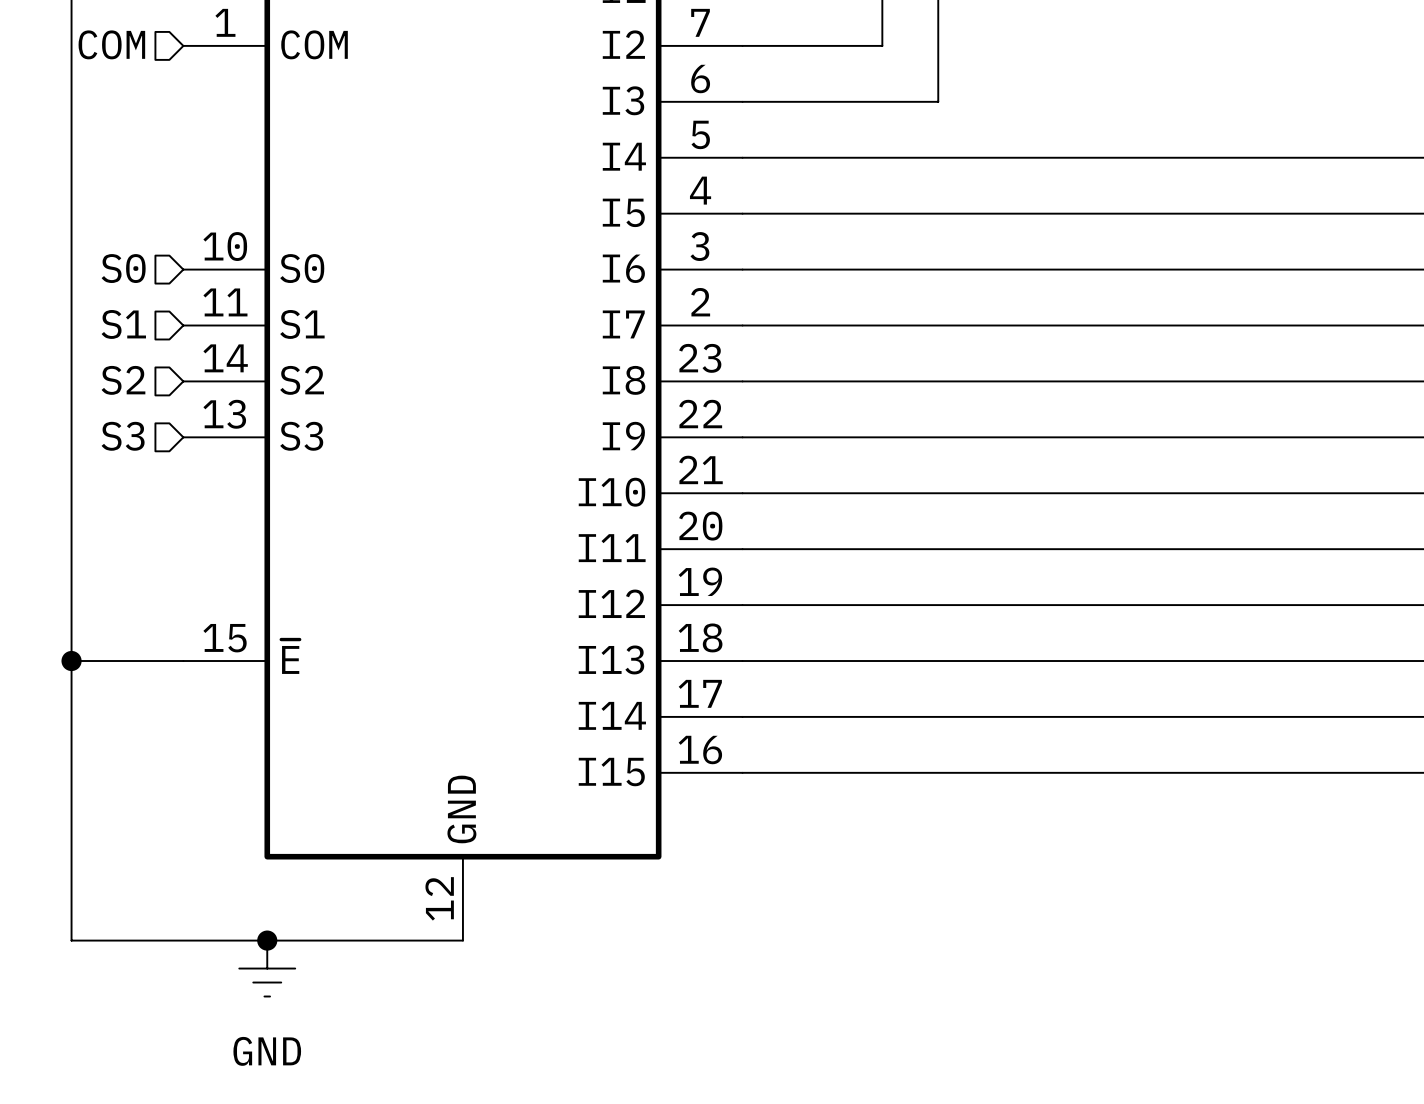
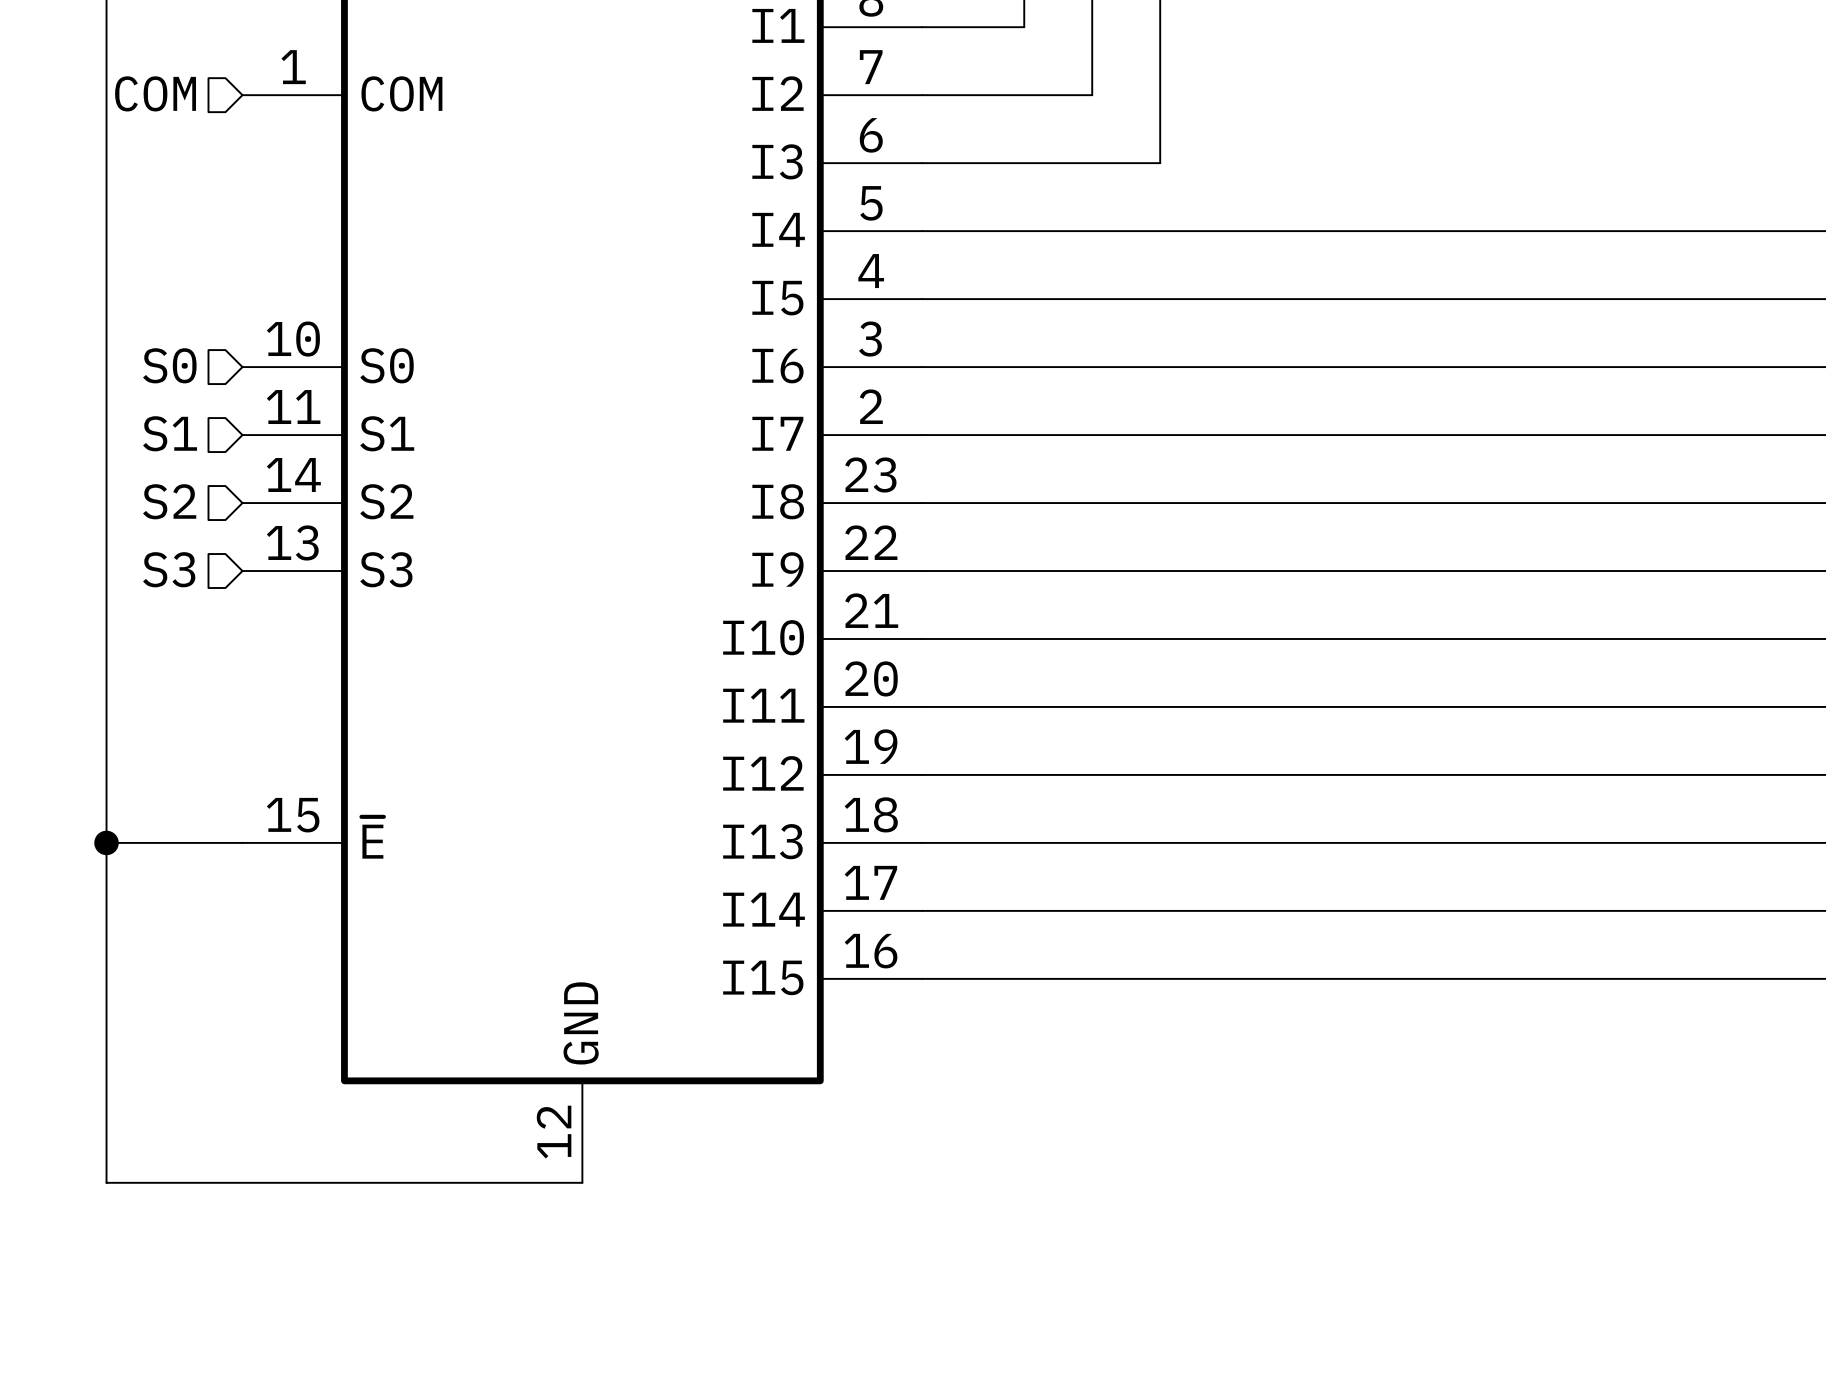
junction: (267, 940) -> none
power symbol: GND (267, 968) -> none

